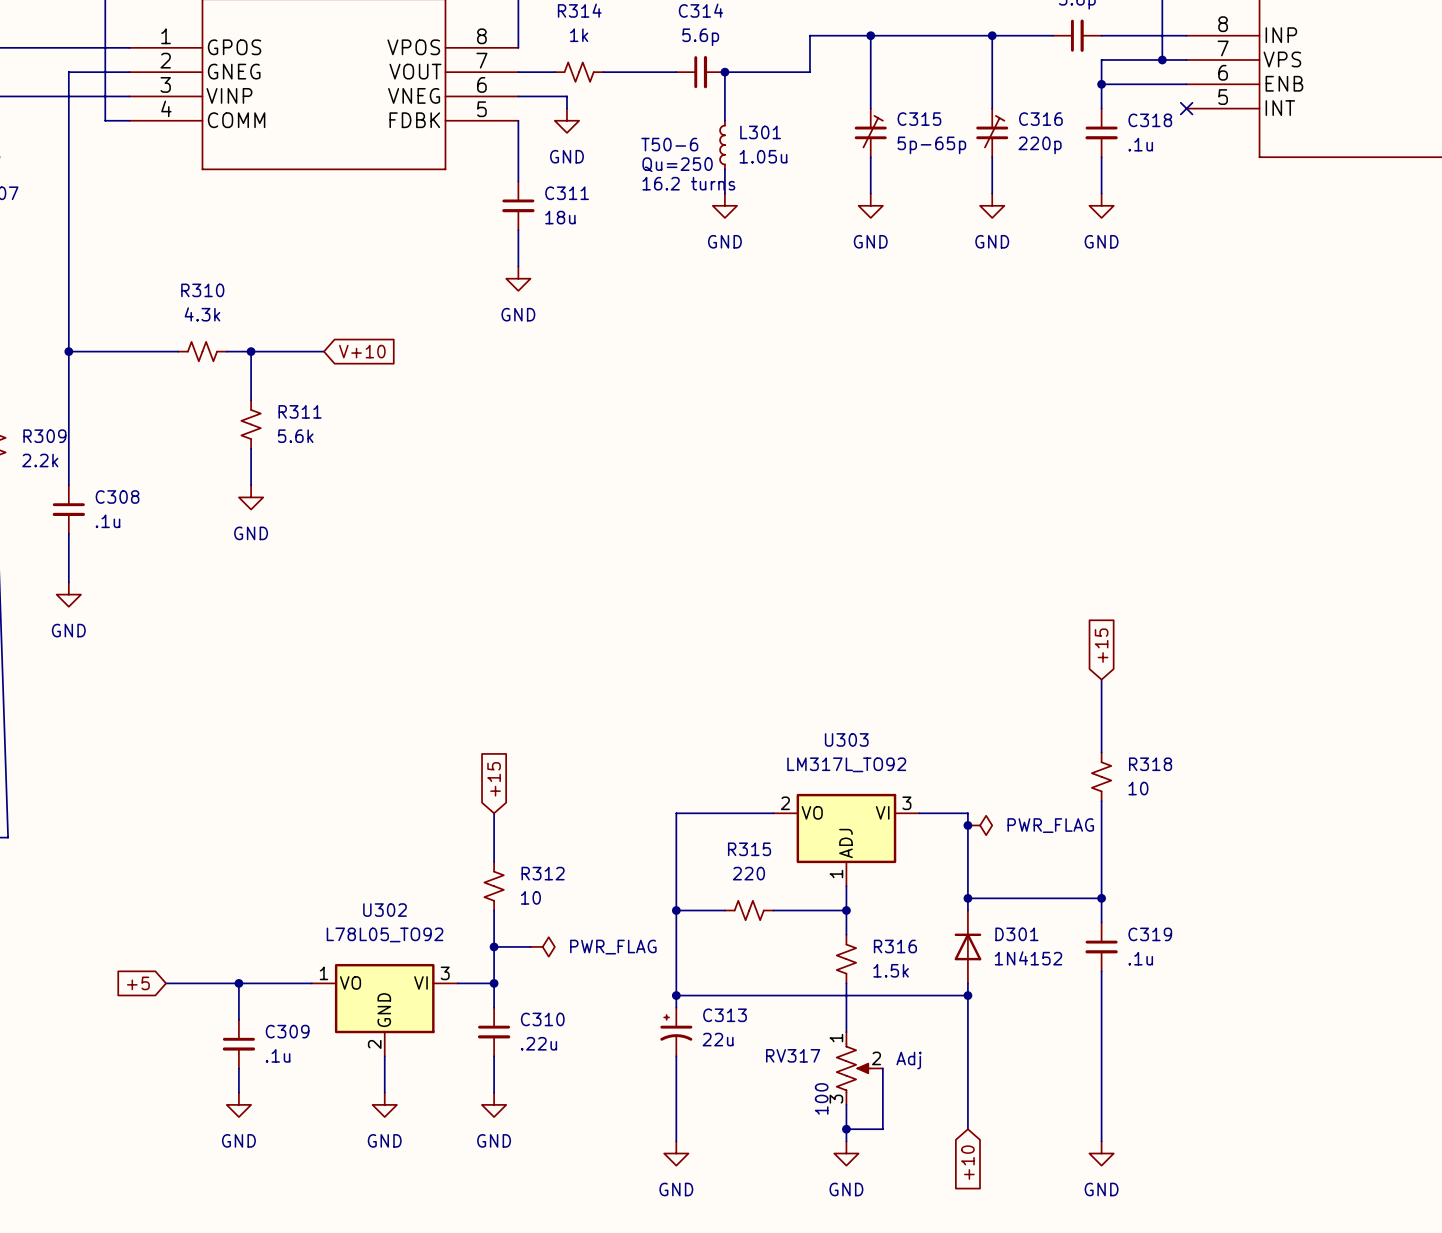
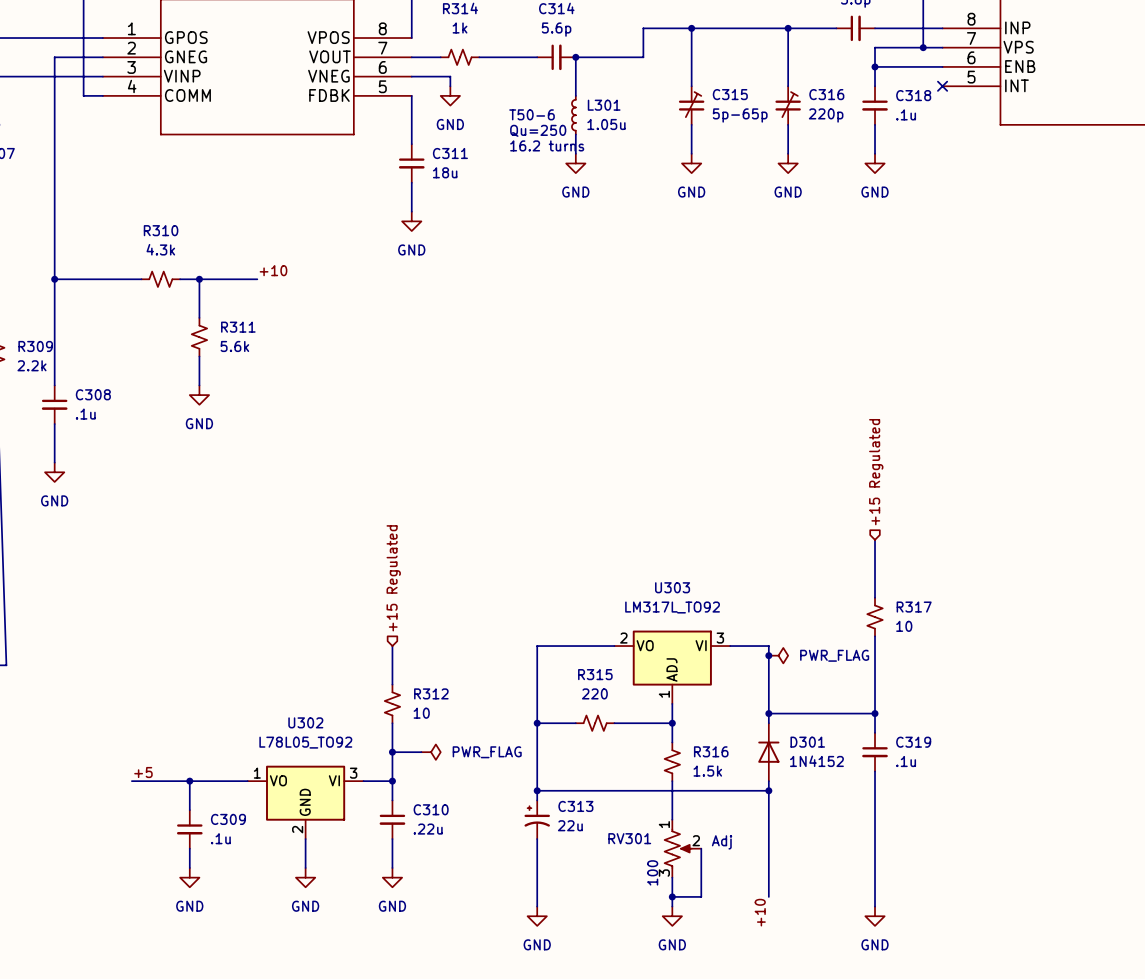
label: none -> +10 (273, 270)
global label: V+10 (362, 351) -> none
hierarchical label: none -> +15 Regulated (876, 472)
global label: +15 (1101, 645) -> none
hierarchical label: none -> +15 Regulated (393, 578)
R318 name: R318 (1150, 764) -> R317 (914, 607)
global label: +15 (494, 779) -> none
label: none -> +5 (143, 772)
global label: +5 (138, 983) -> none
RV317 name: RV317 (793, 1055) -> RV301 (629, 838)
label: none -> +10 (760, 912)
global label: +10 (967, 1162) -> none

